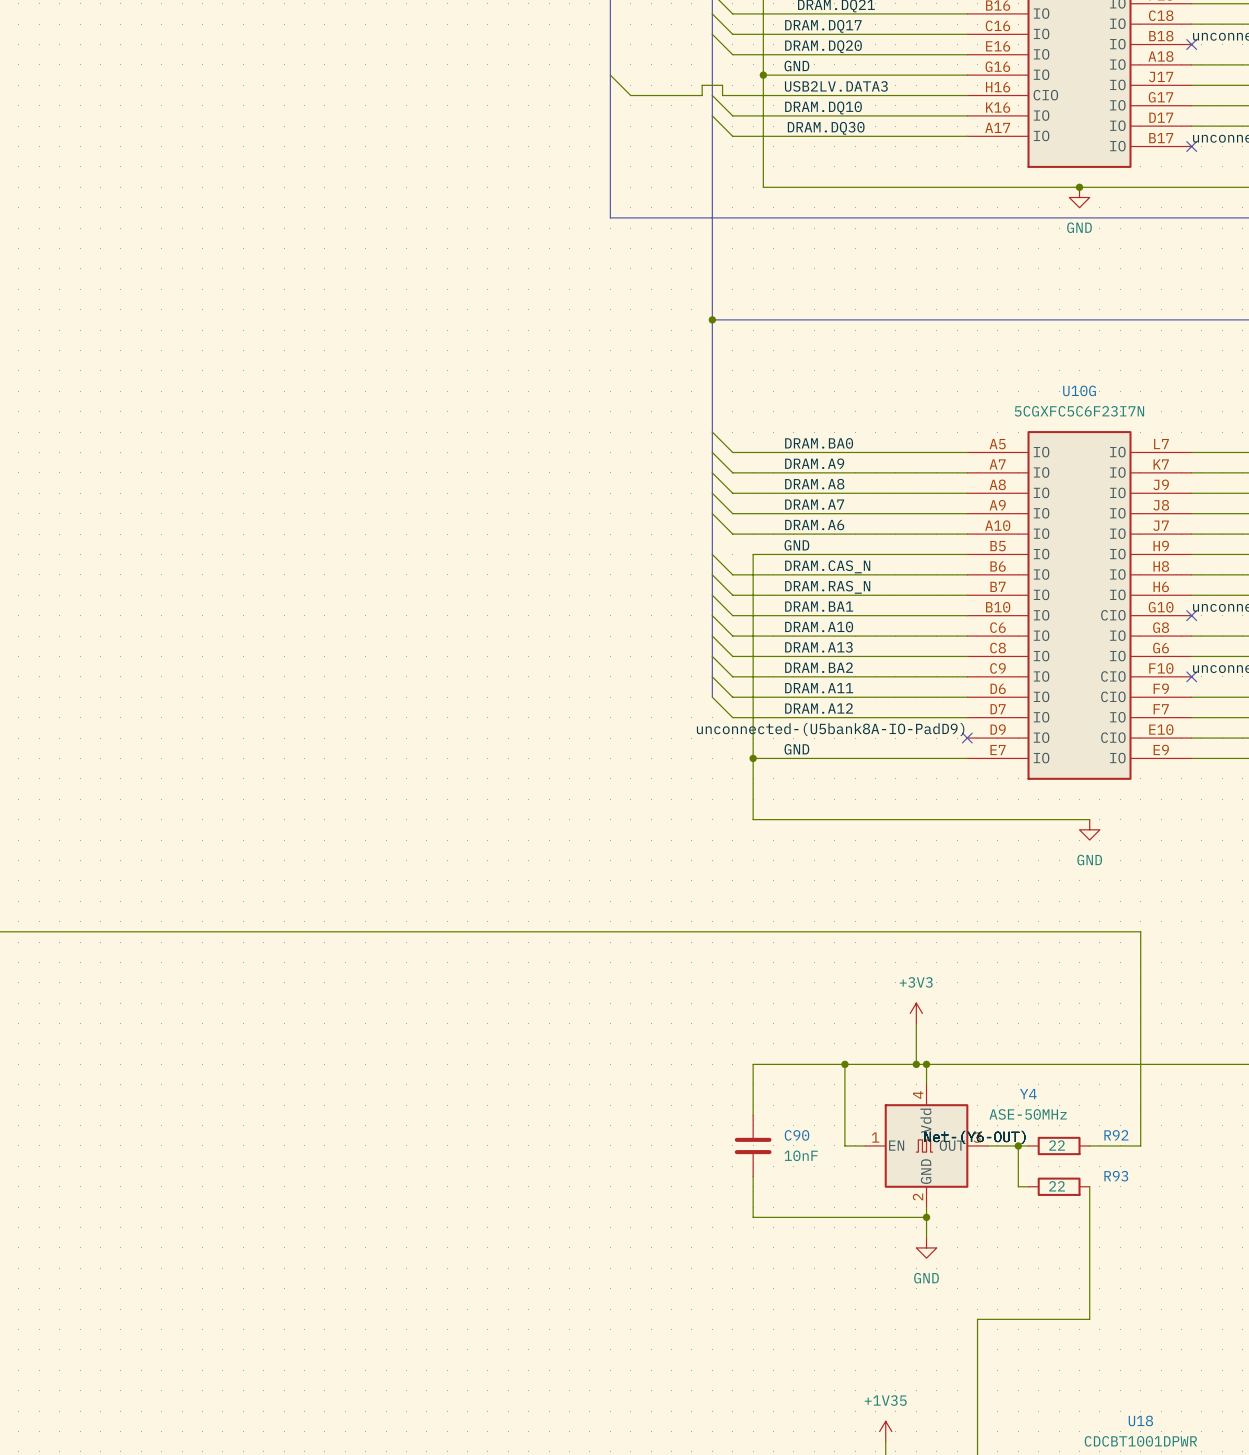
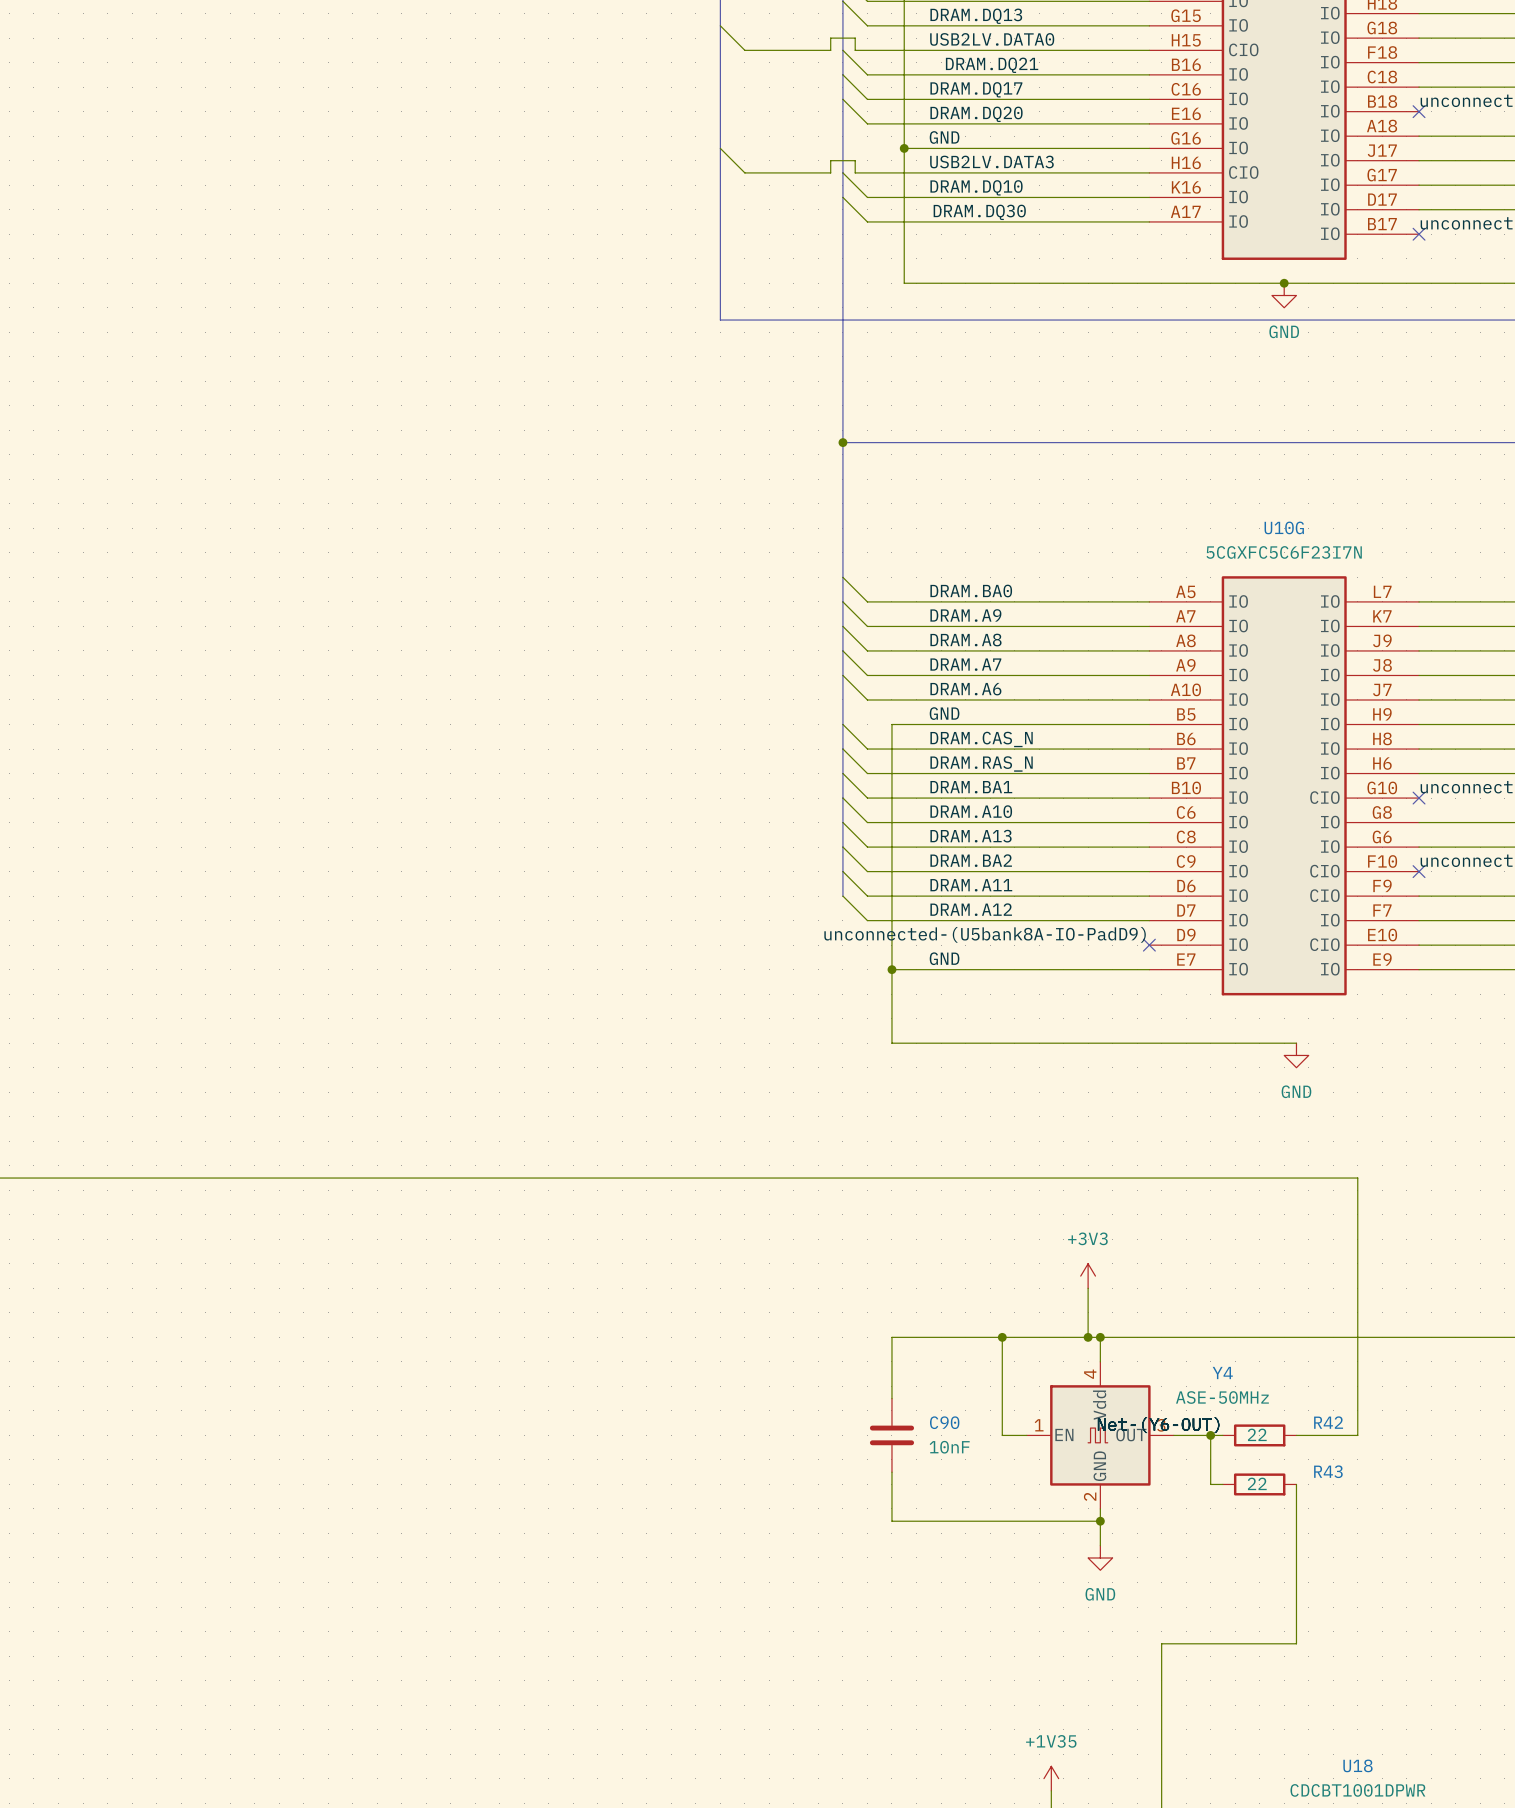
R92 name: R92 (1116, 1135) -> R42 (1328, 1422)
R93 name: R93 (1116, 1176) -> R43 (1328, 1471)

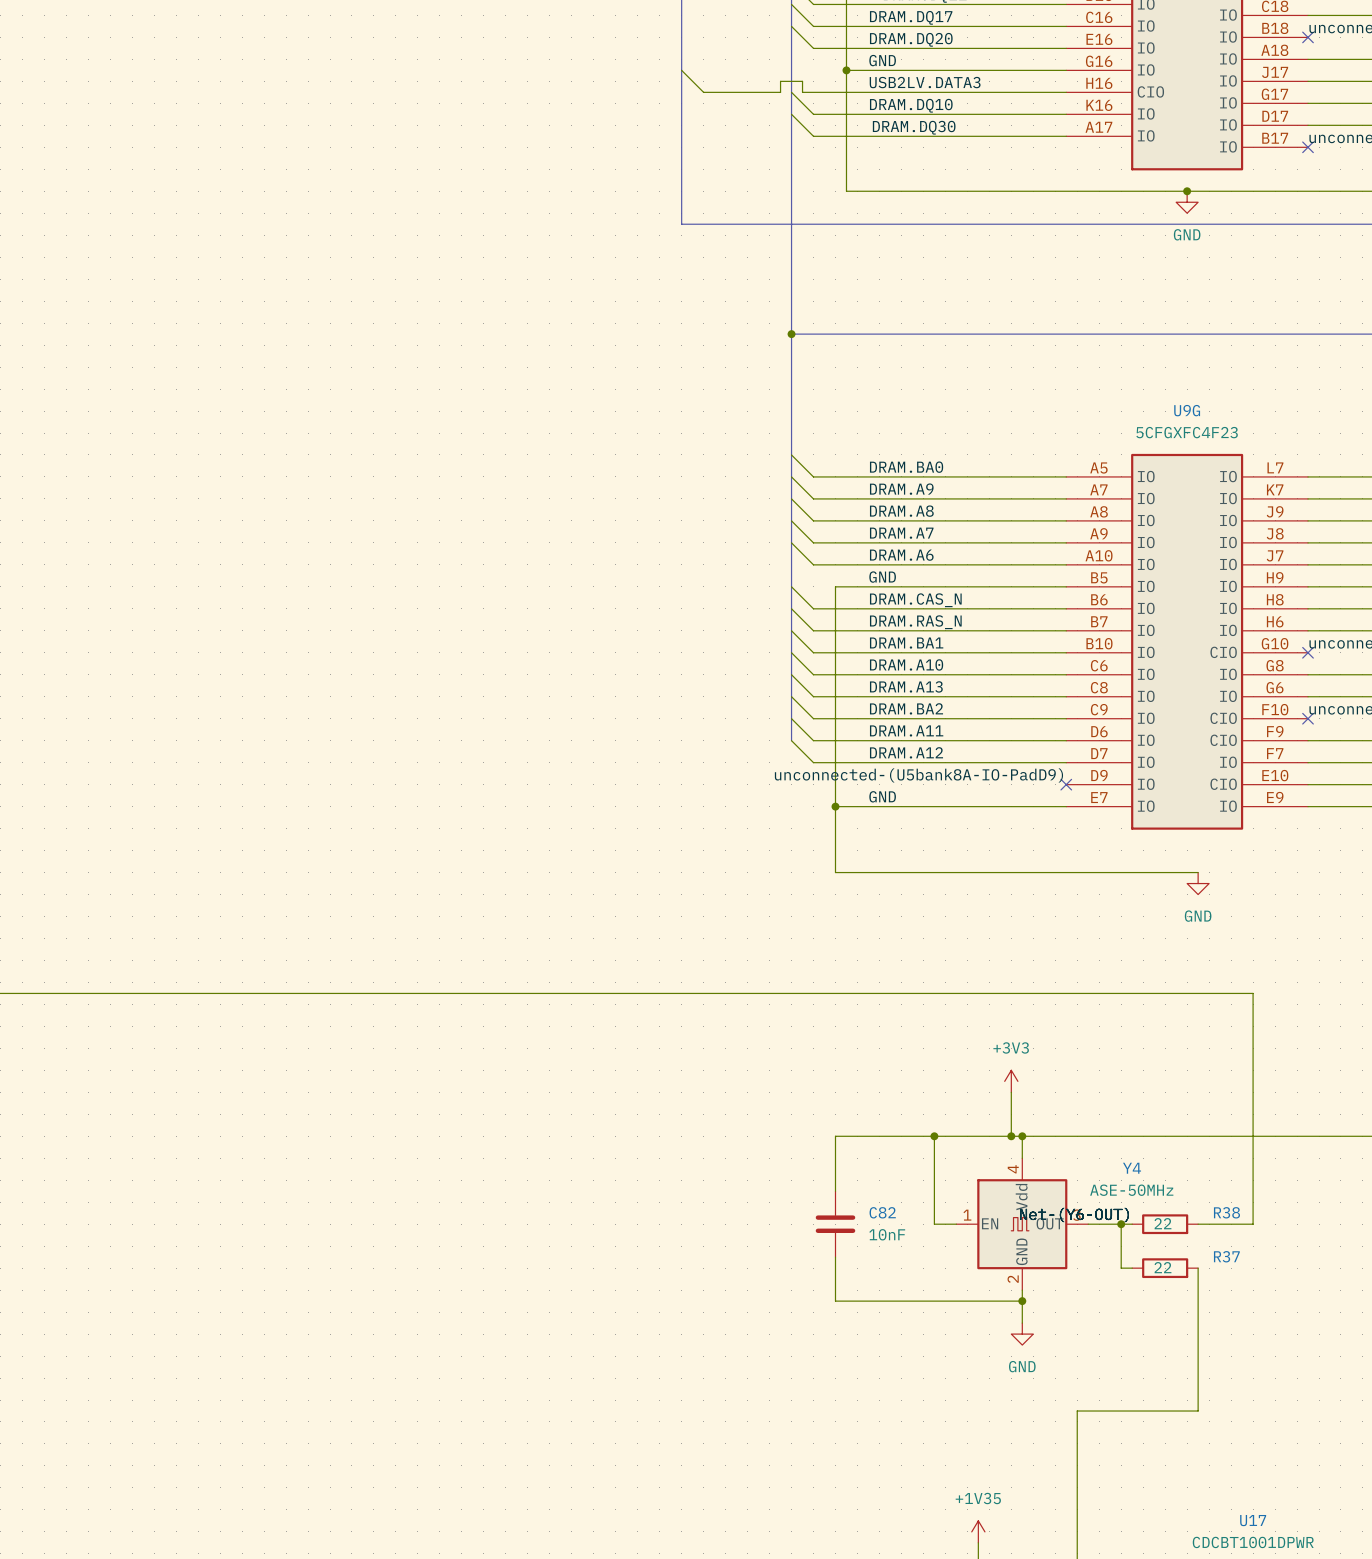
U10G name: U10G (1284, 527) -> U9G (1187, 410)
U10G value: 5CGXFC5C6F23I7N (1284, 552) -> 5CFGXFC4F23 (1187, 432)
C90 name: C90 (944, 1422) -> C82 (882, 1212)
R42 name: R42 (1328, 1422) -> R38 (1226, 1212)
R43 name: R43 (1328, 1471) -> R37 (1226, 1256)
U18 name: U18 (1357, 1765) -> U17 (1253, 1520)

